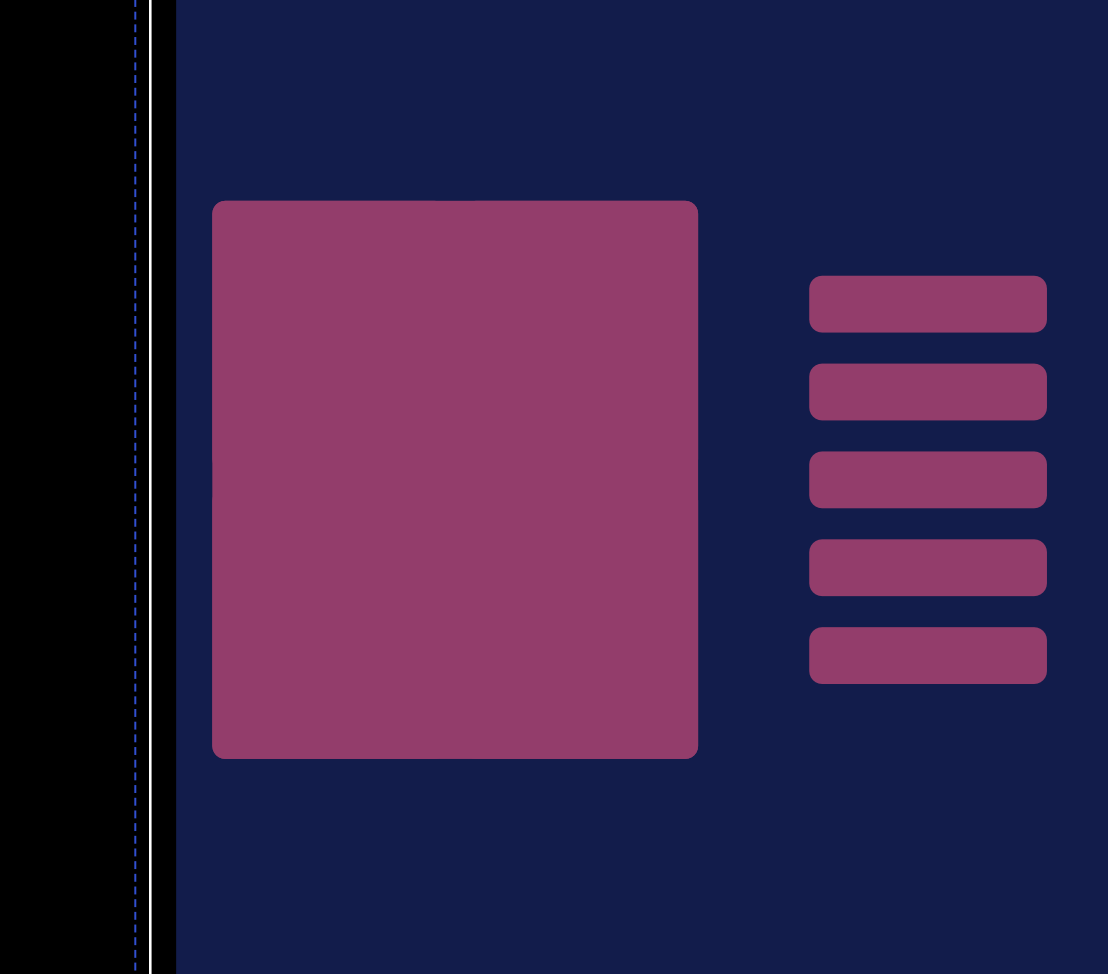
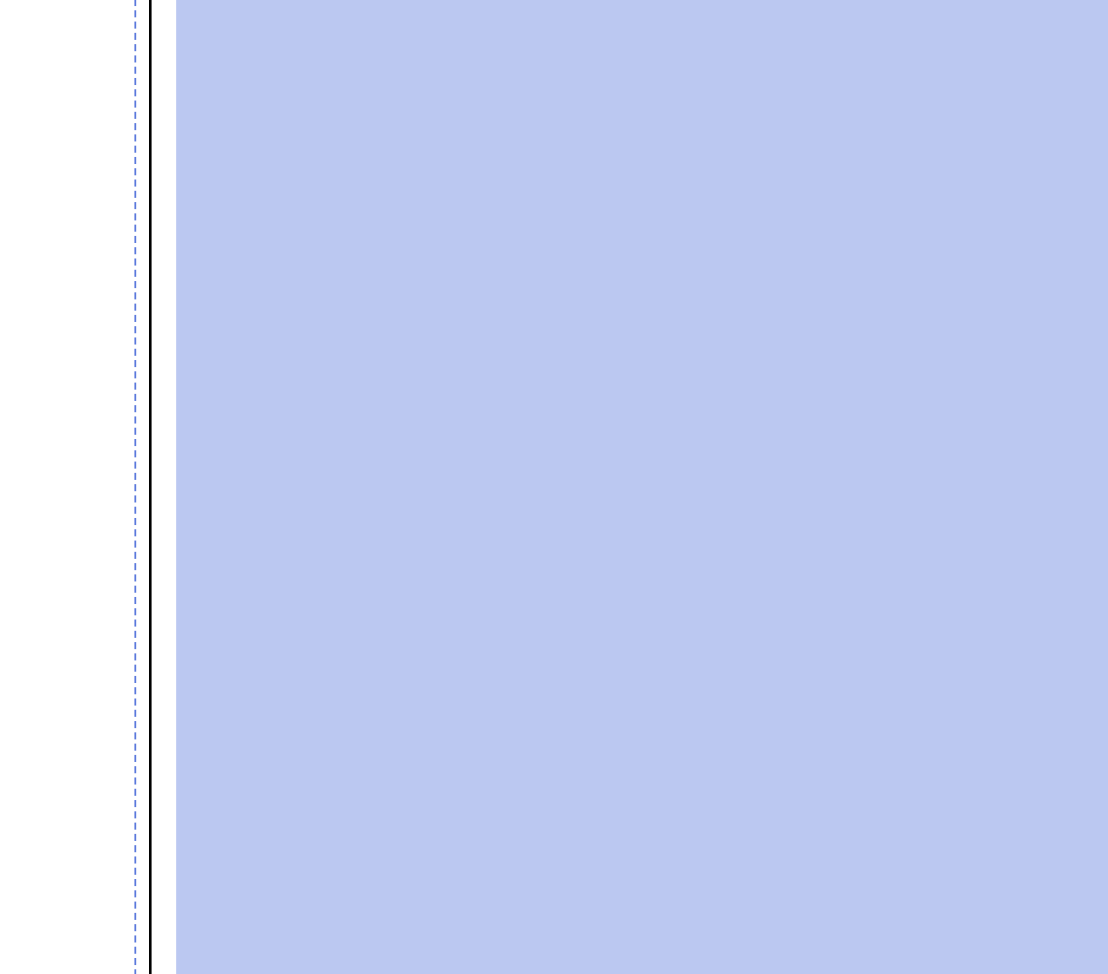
part: (629, 479) -> none

